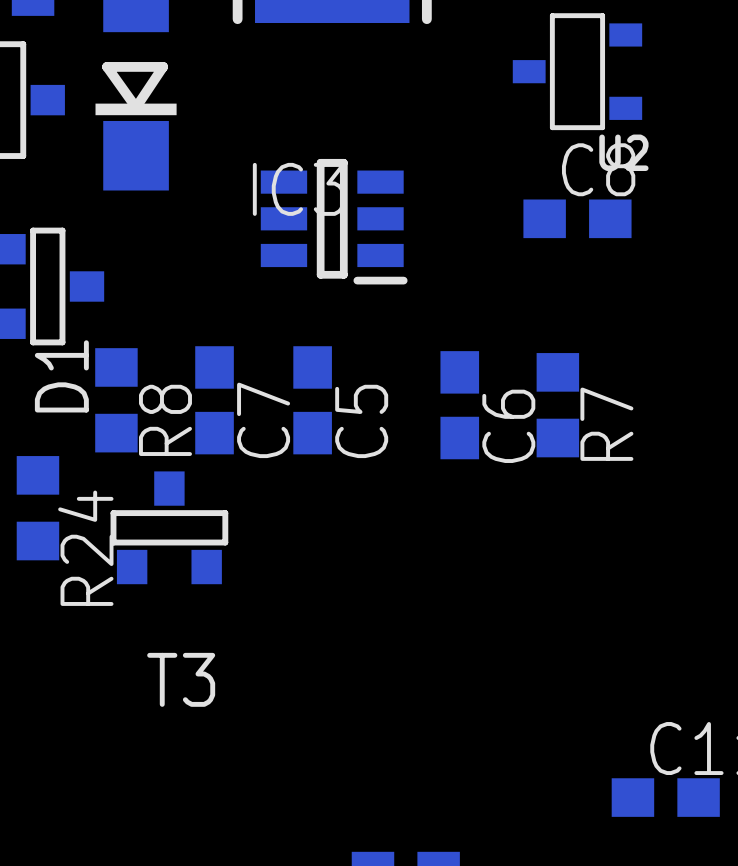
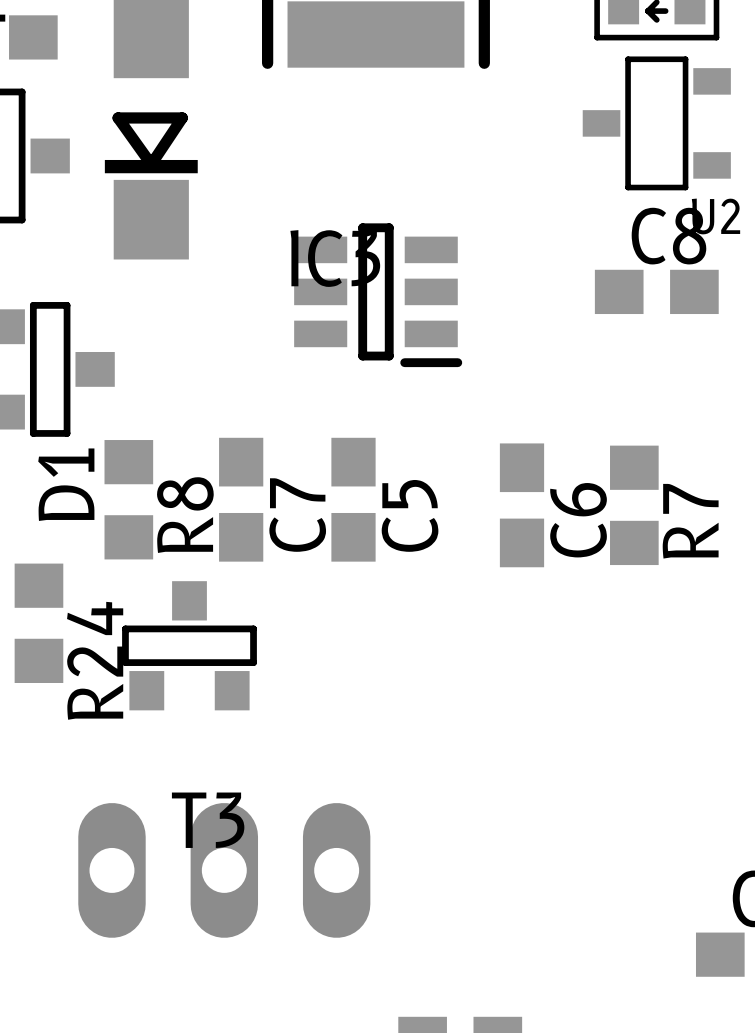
part: none -> (224, 870)

